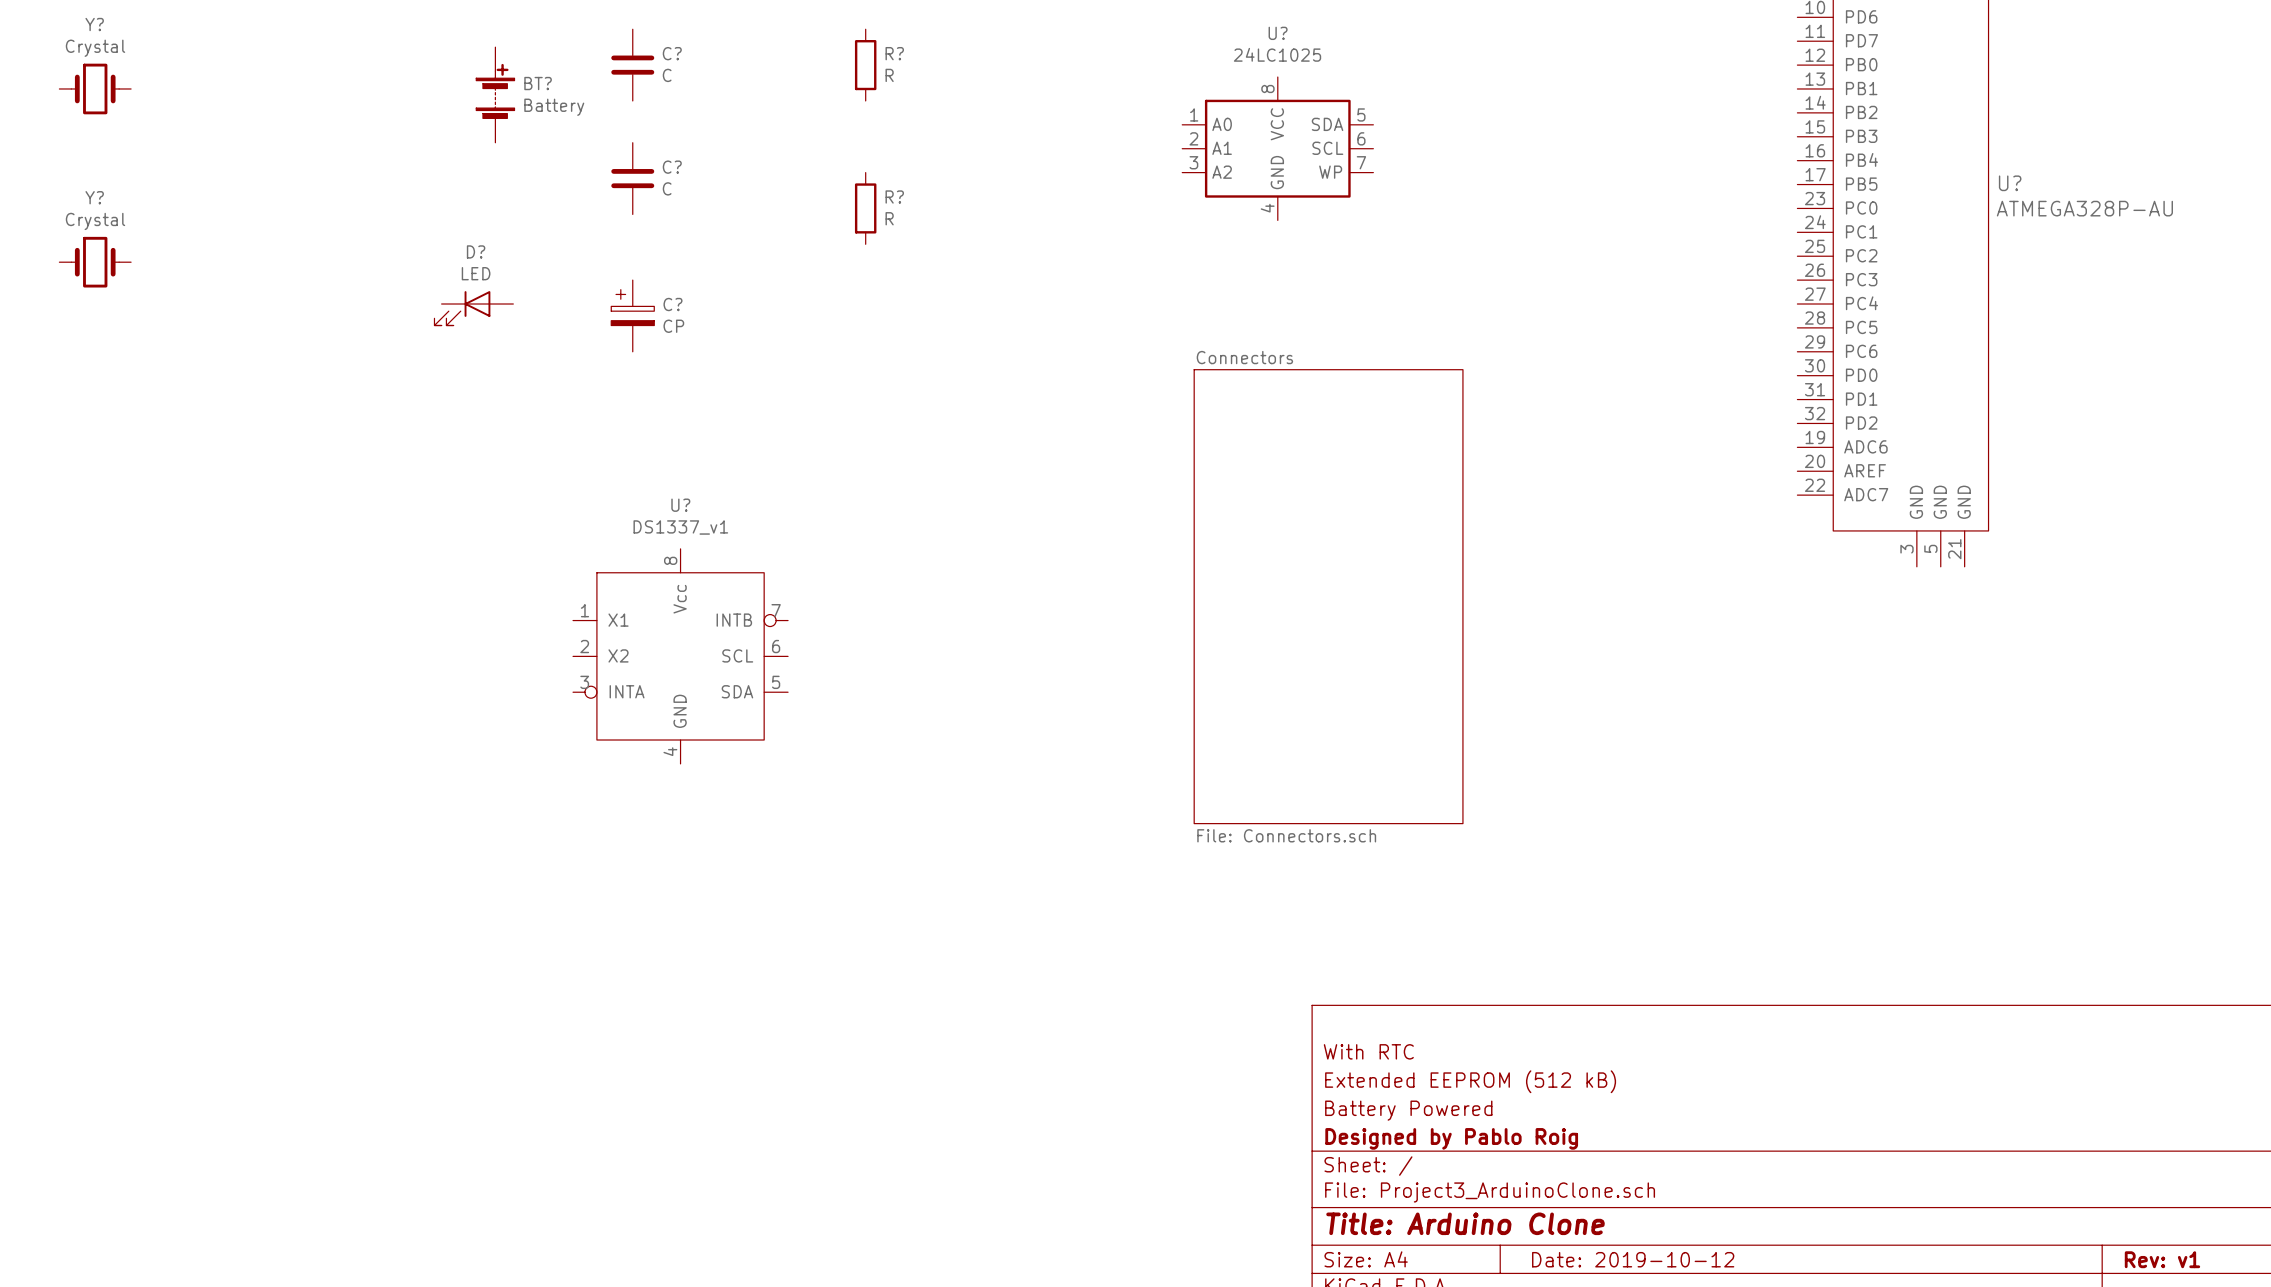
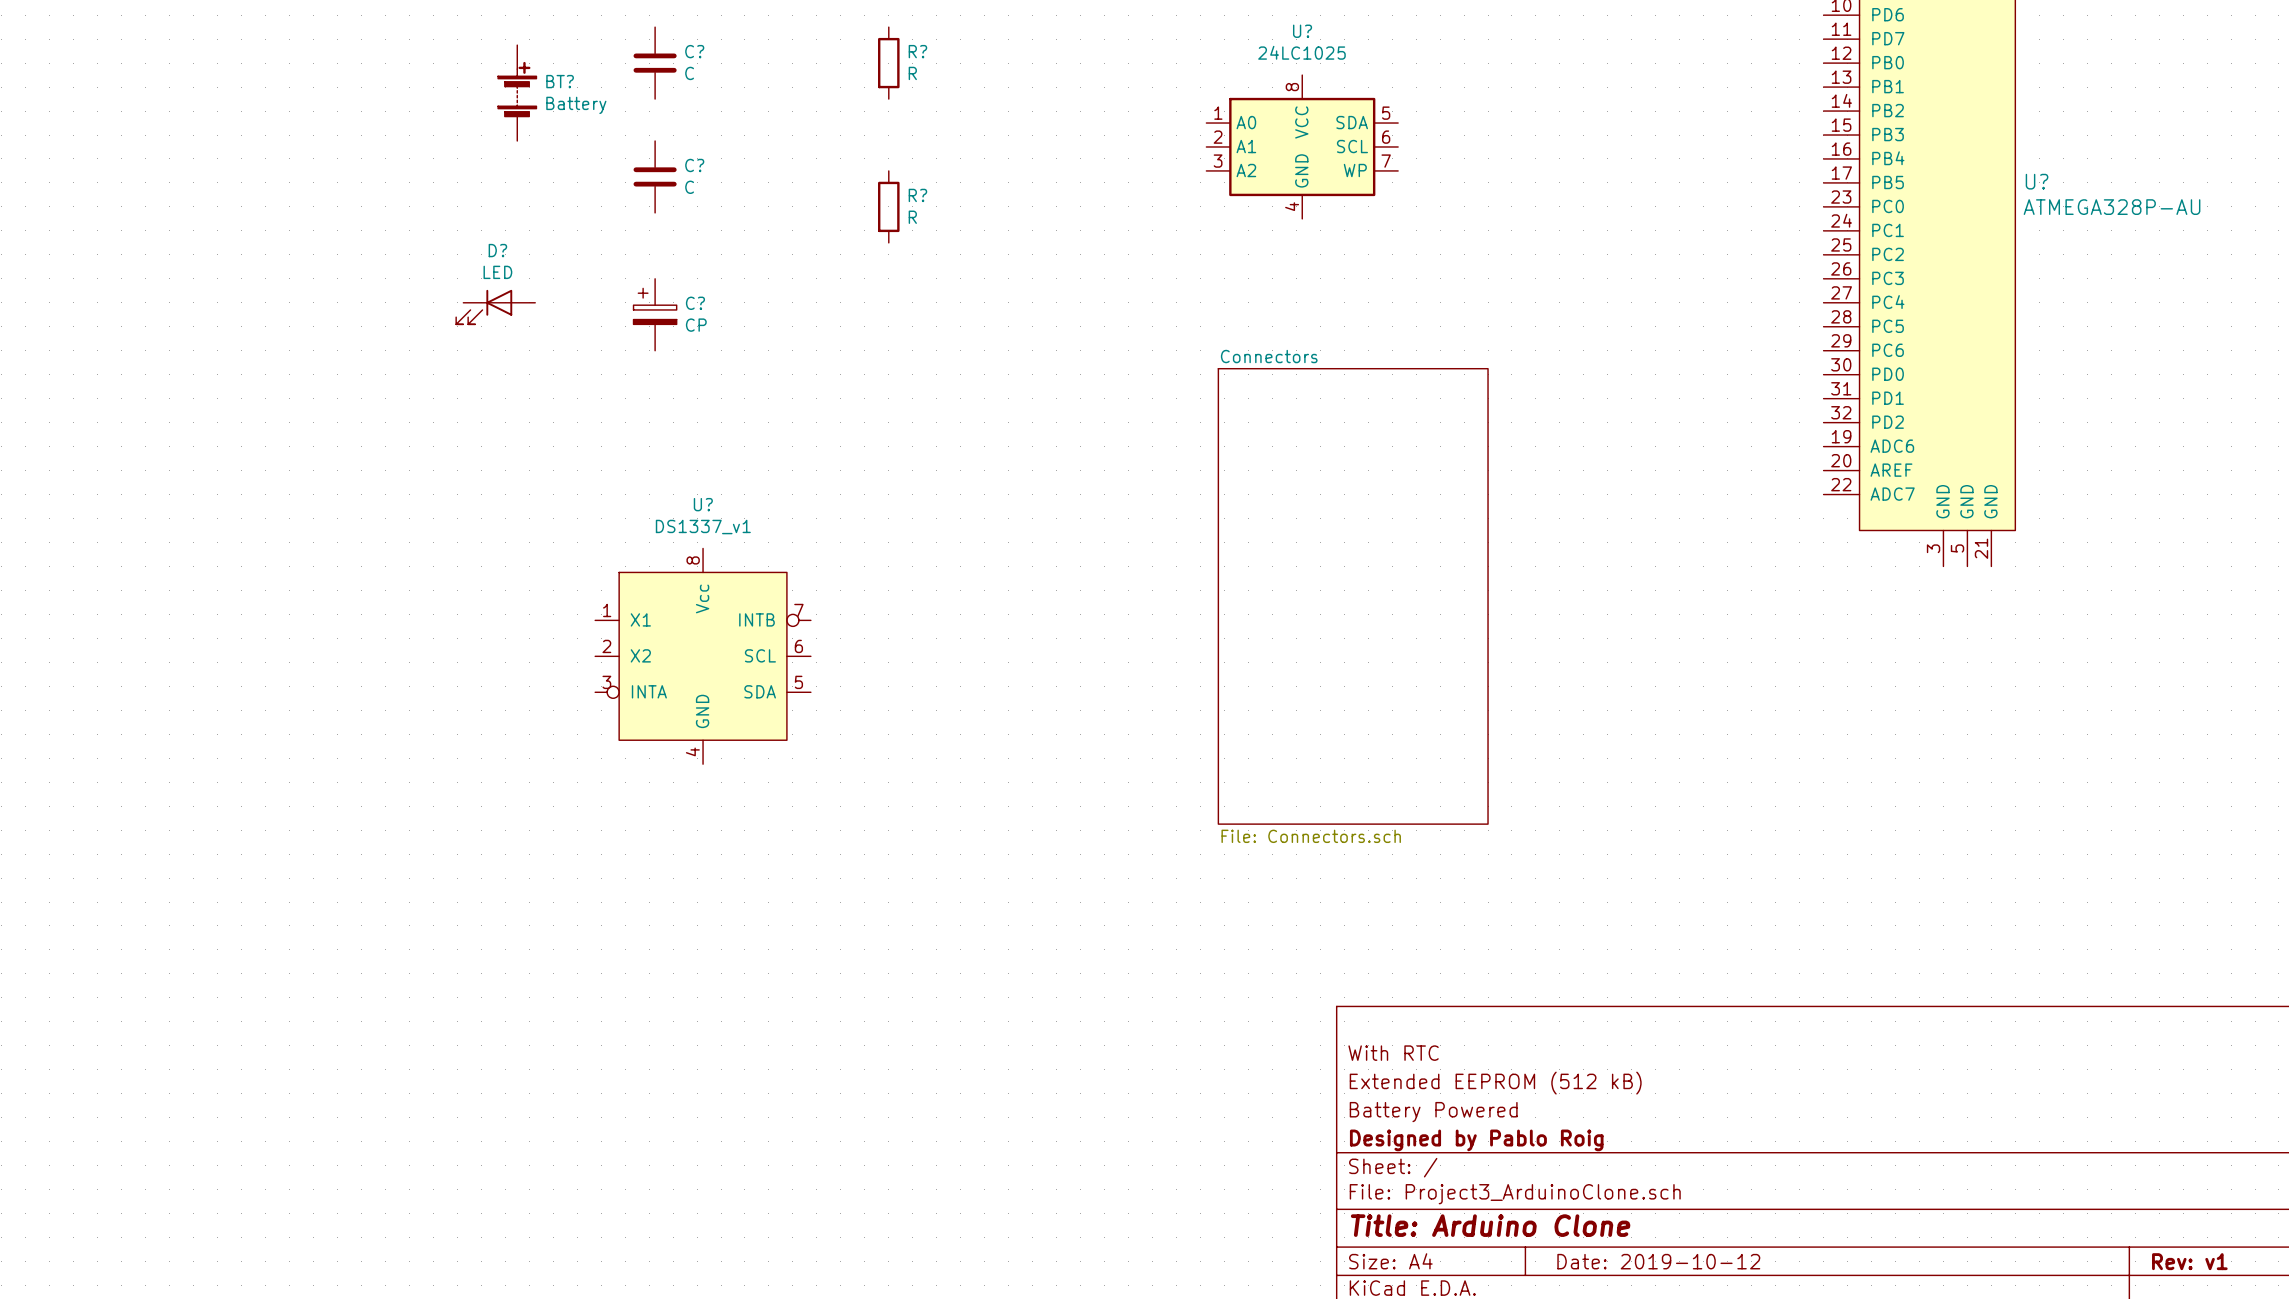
Y?: Crystal (95, 88) -> none
Y?: Crystal (95, 262) -> none

